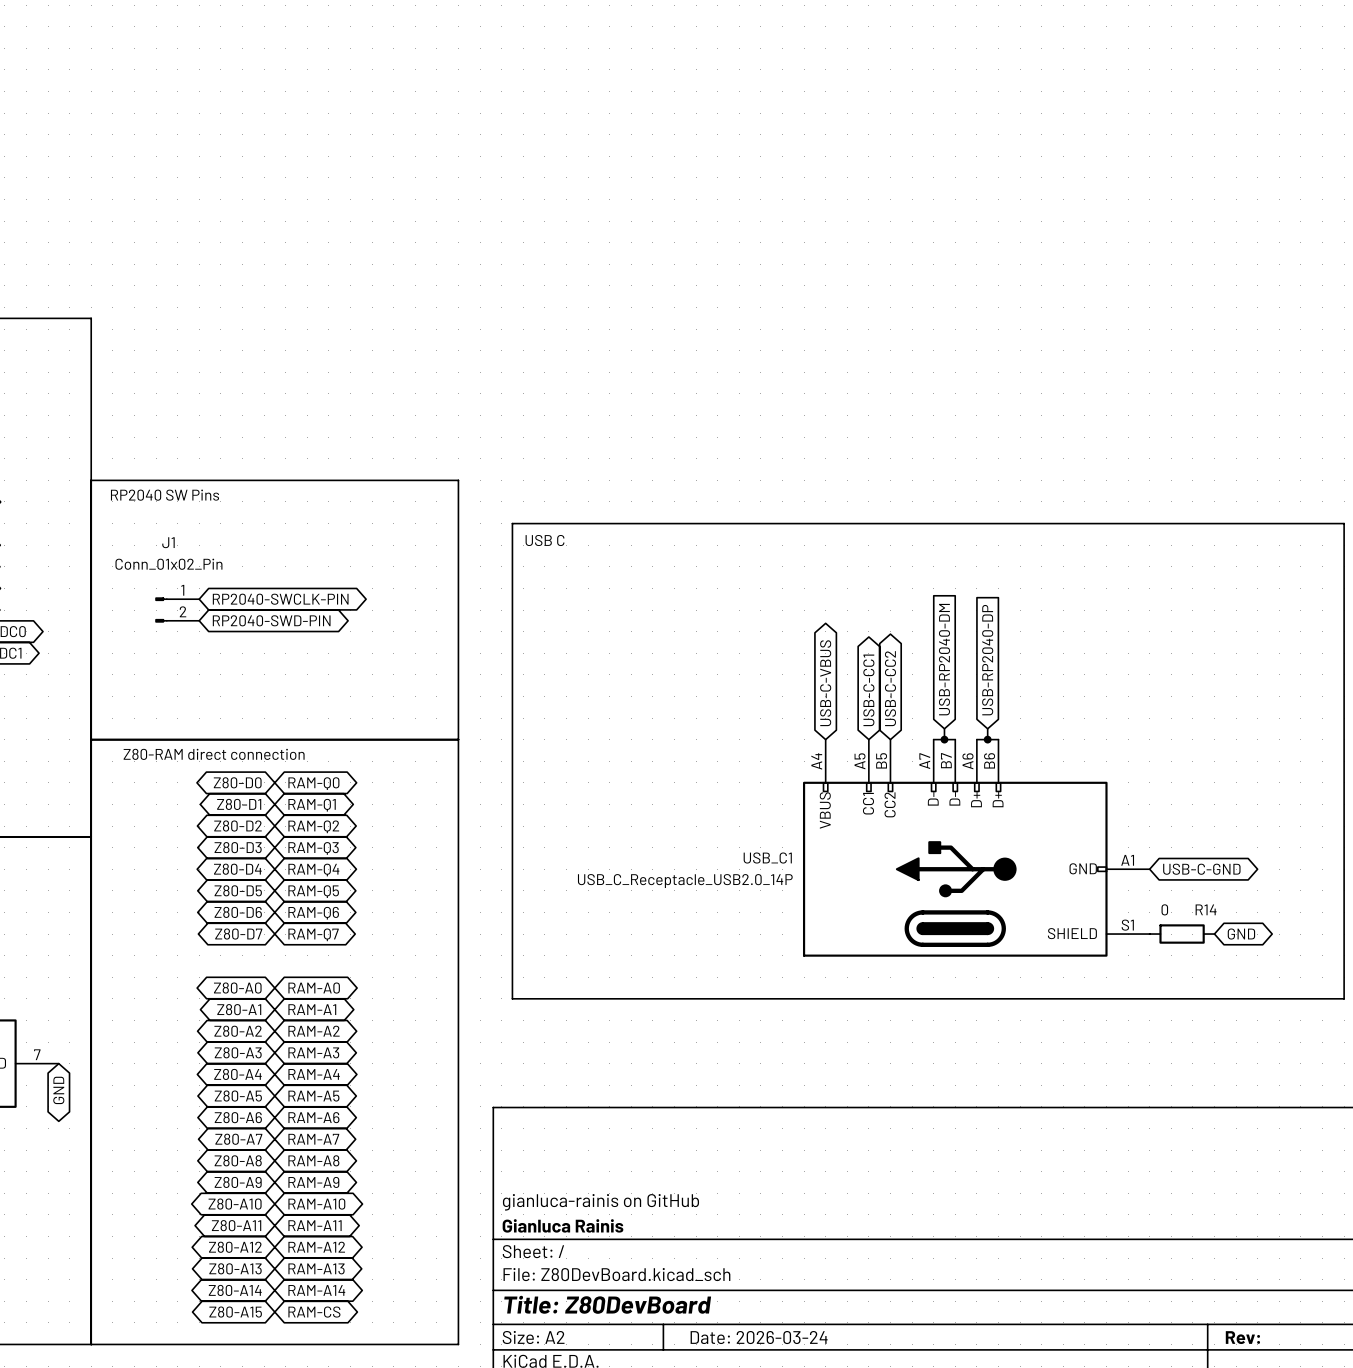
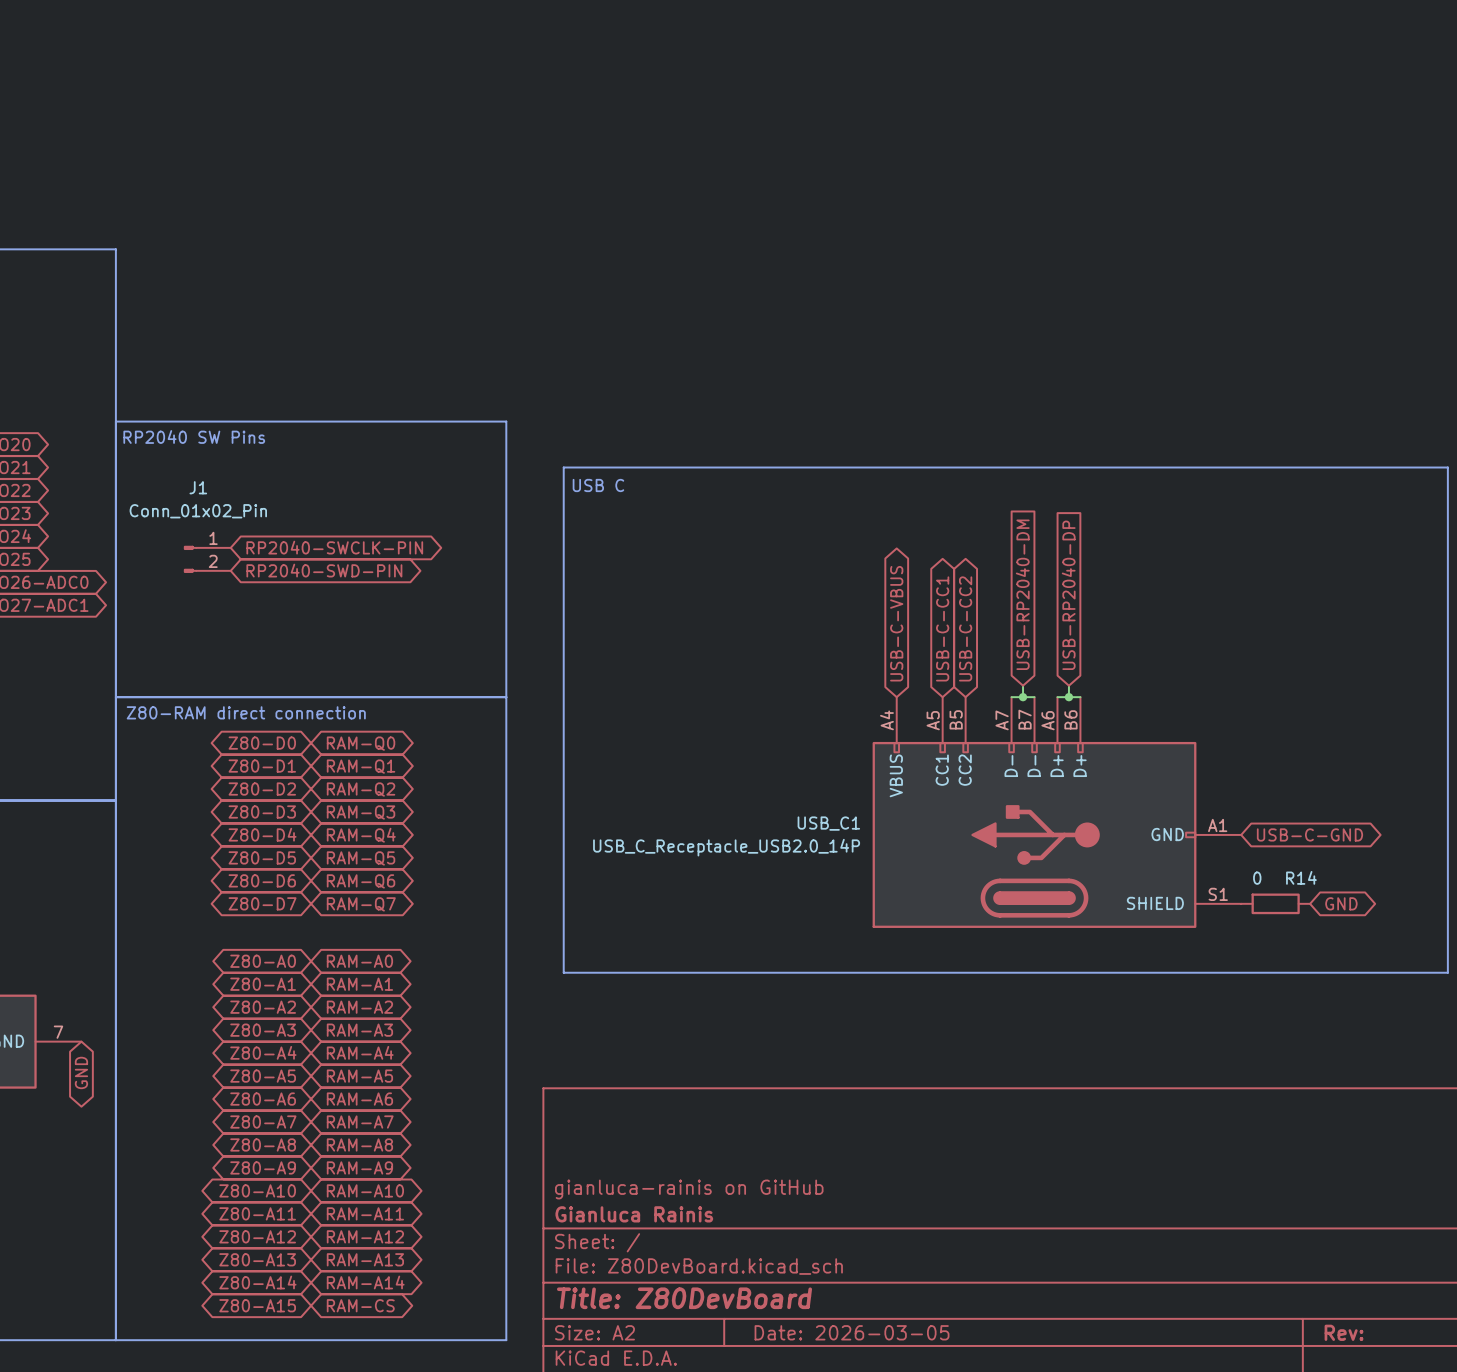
title block: Date: 2026-03-24 (759, 1337) -> Date: 2026-03-05 (852, 1332)

